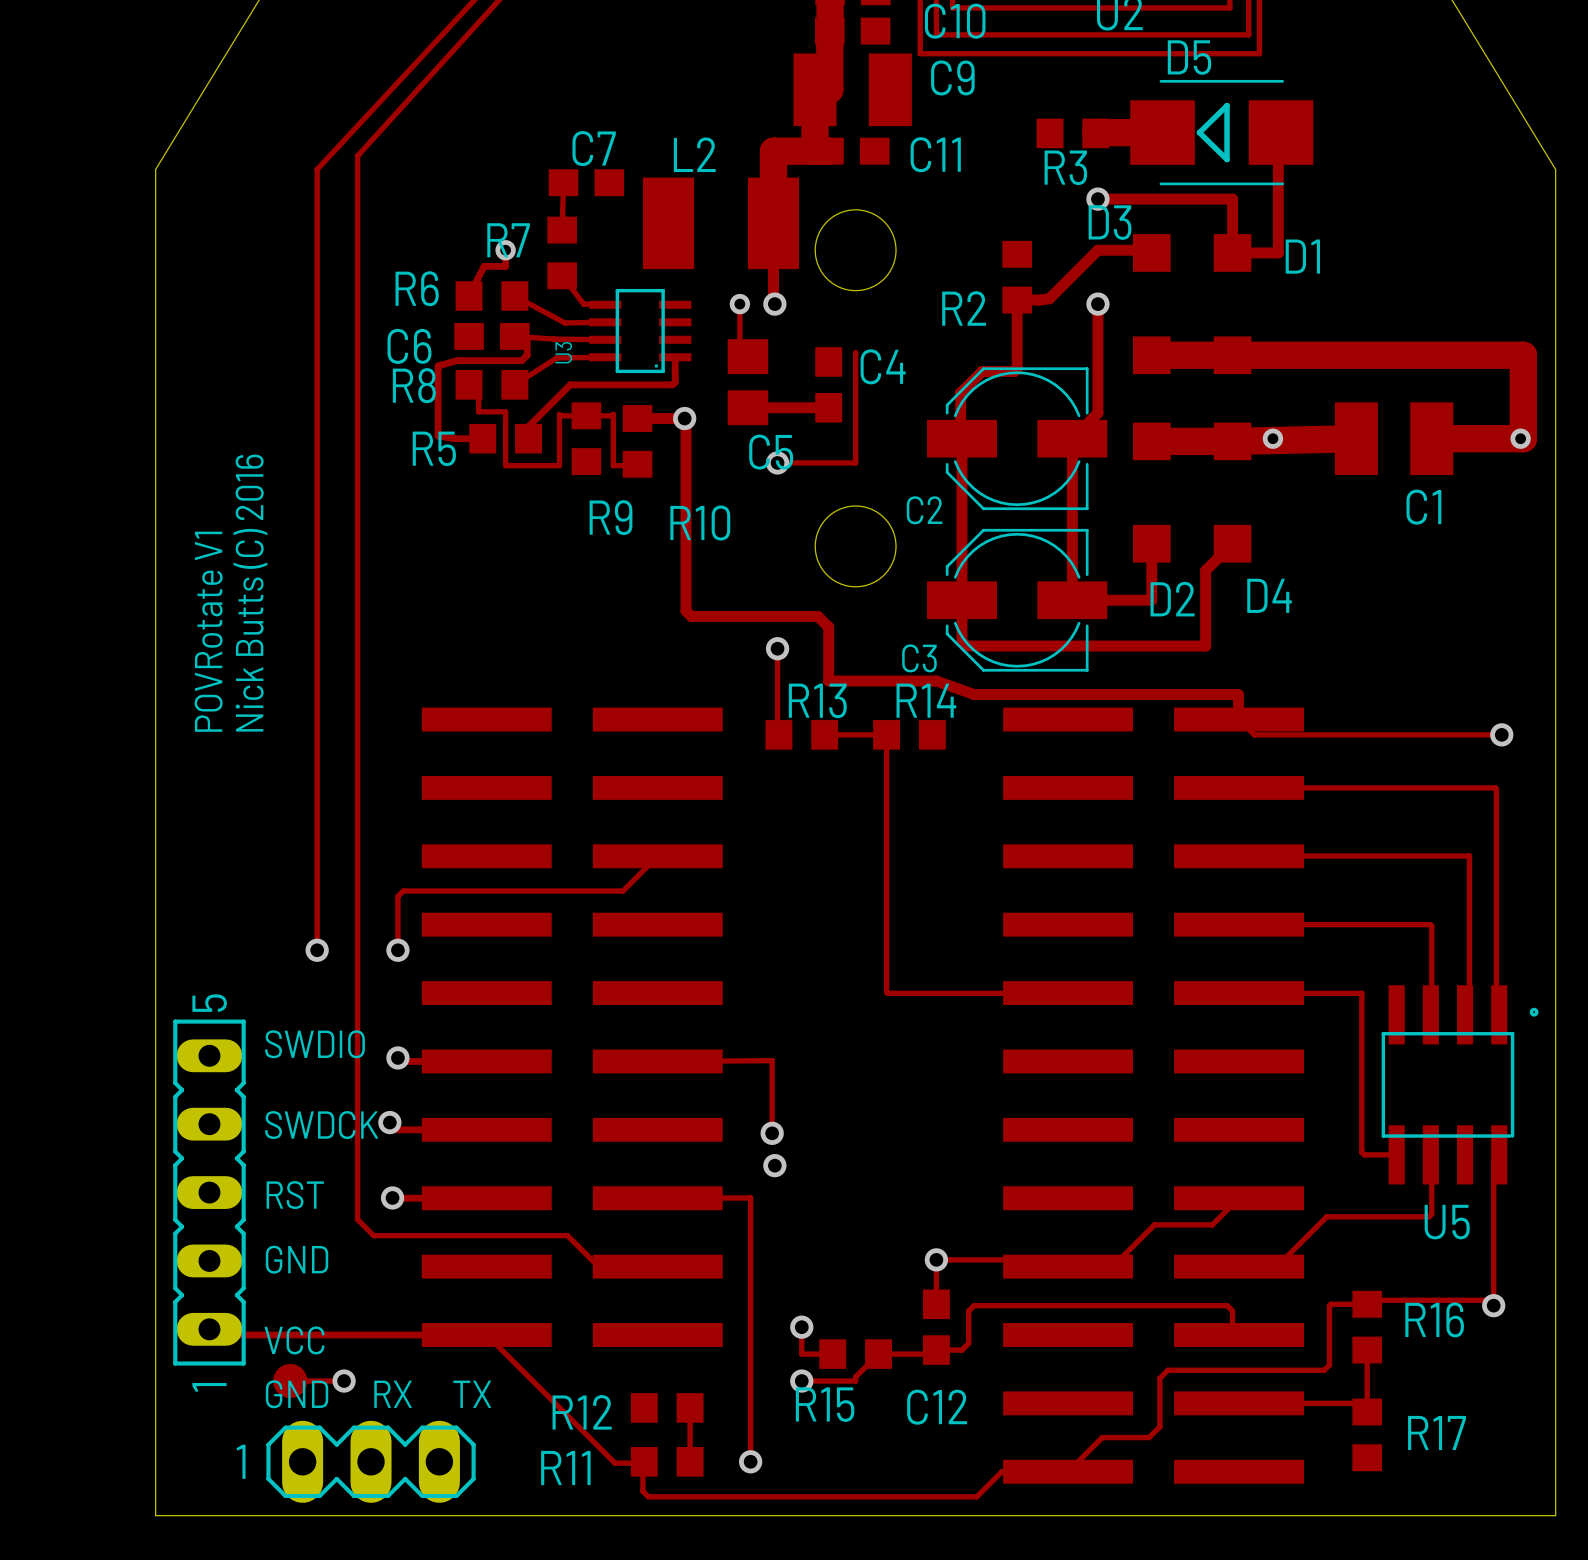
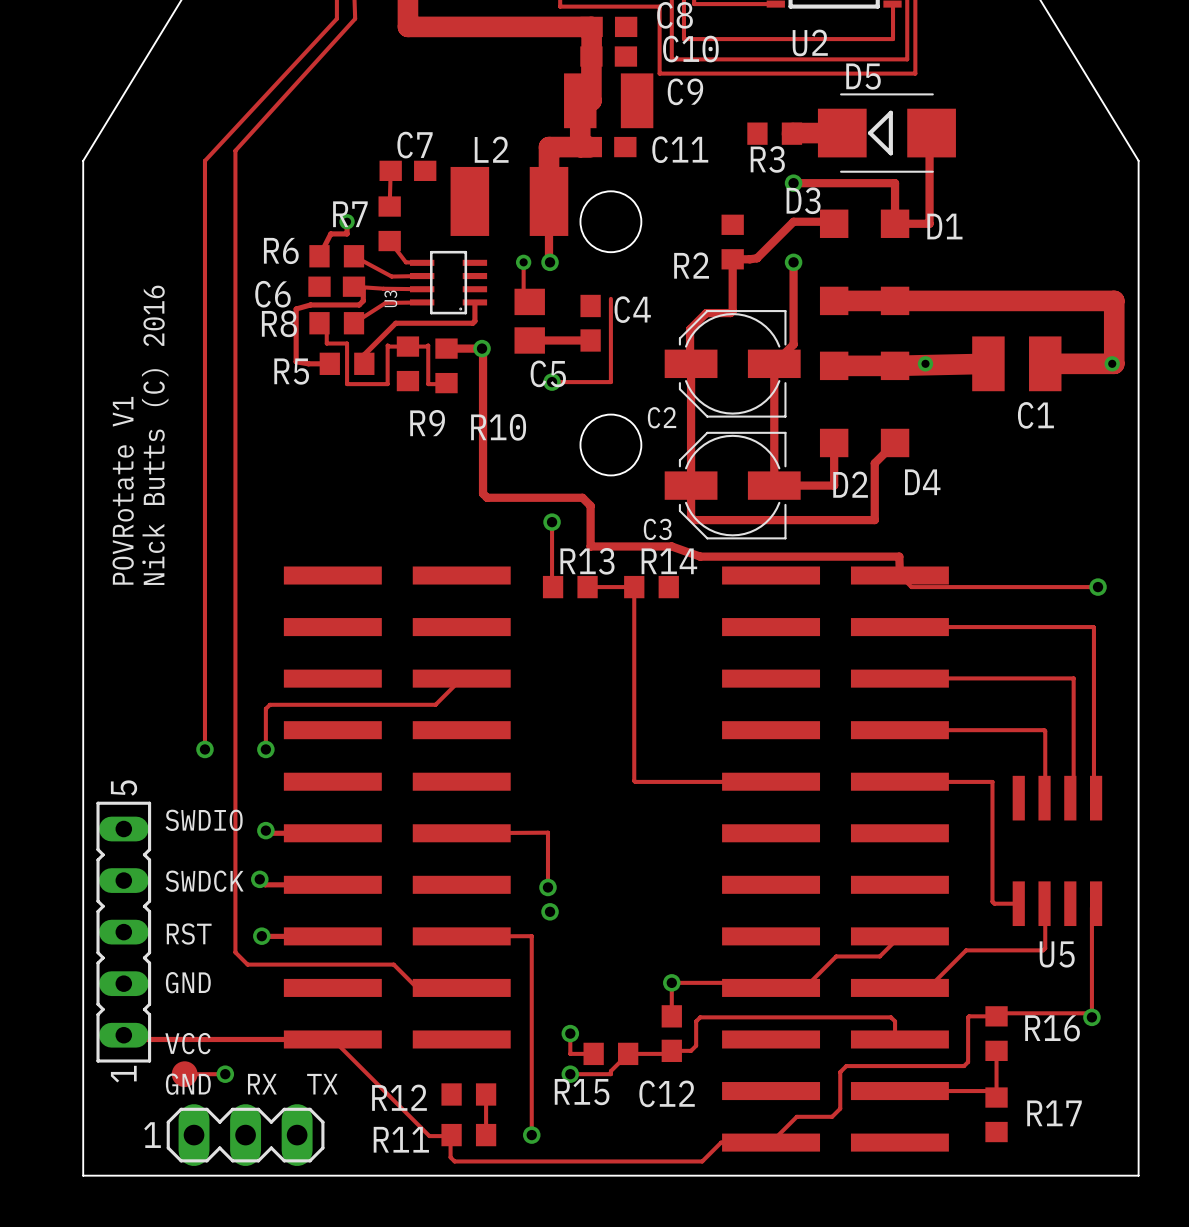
U5 footprint: [1381, 985, 1539, 1185] -> [1012, 775, 1103, 927]

